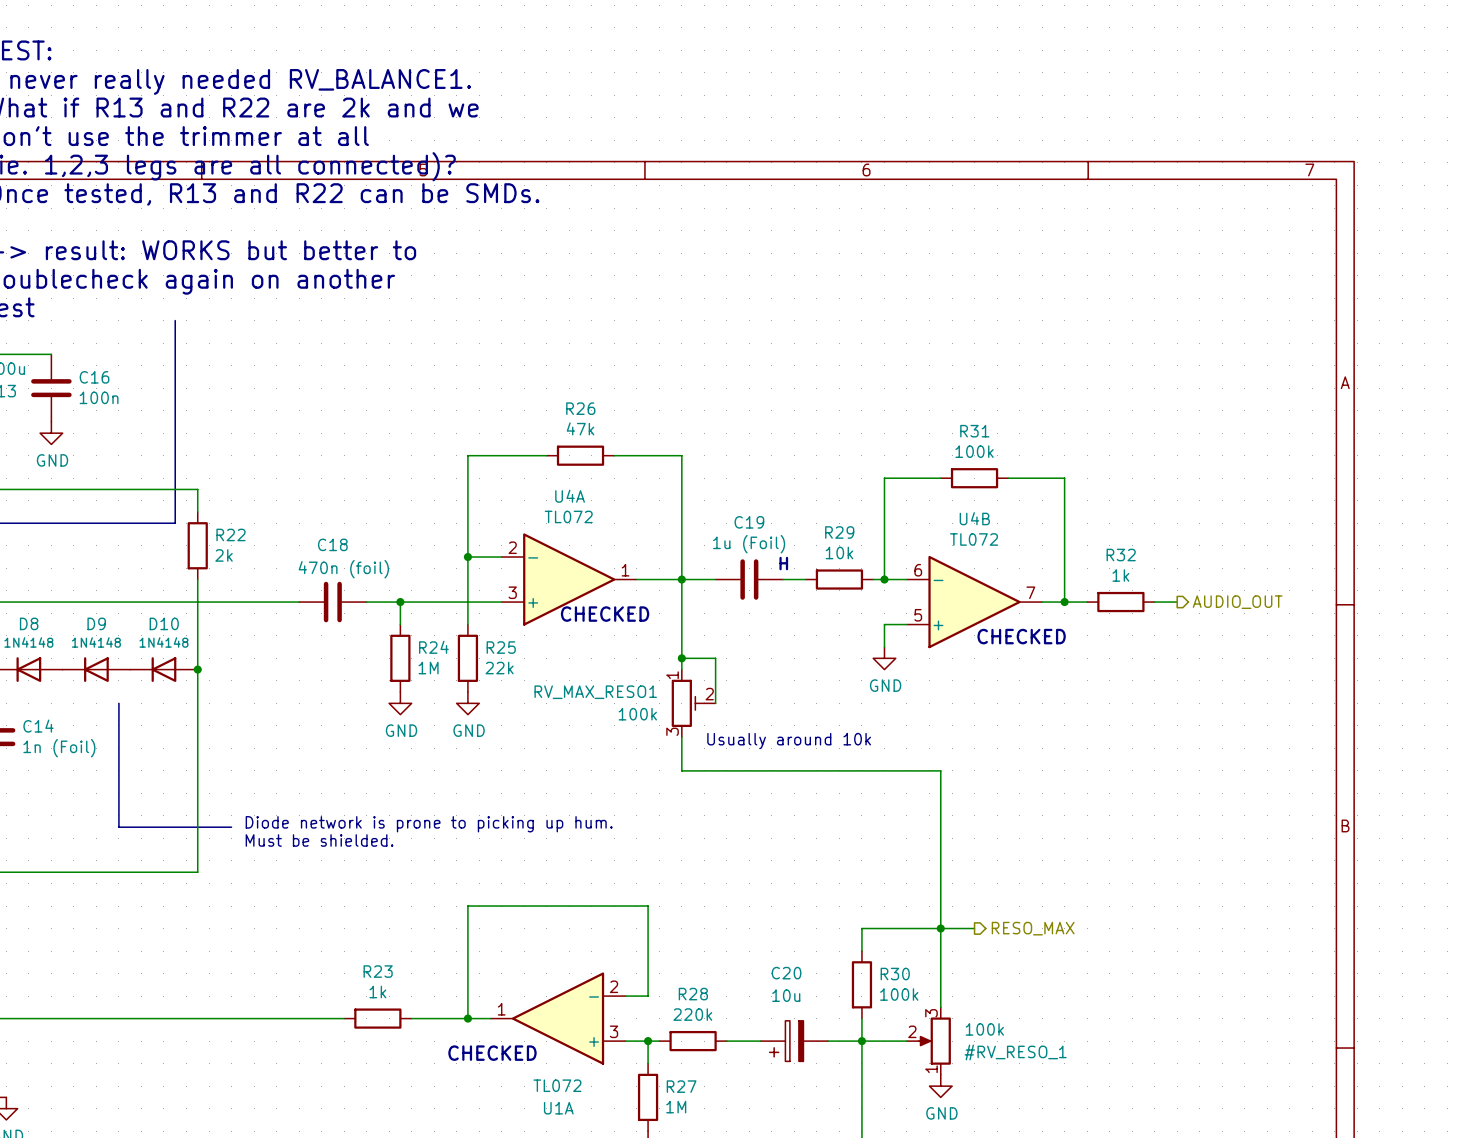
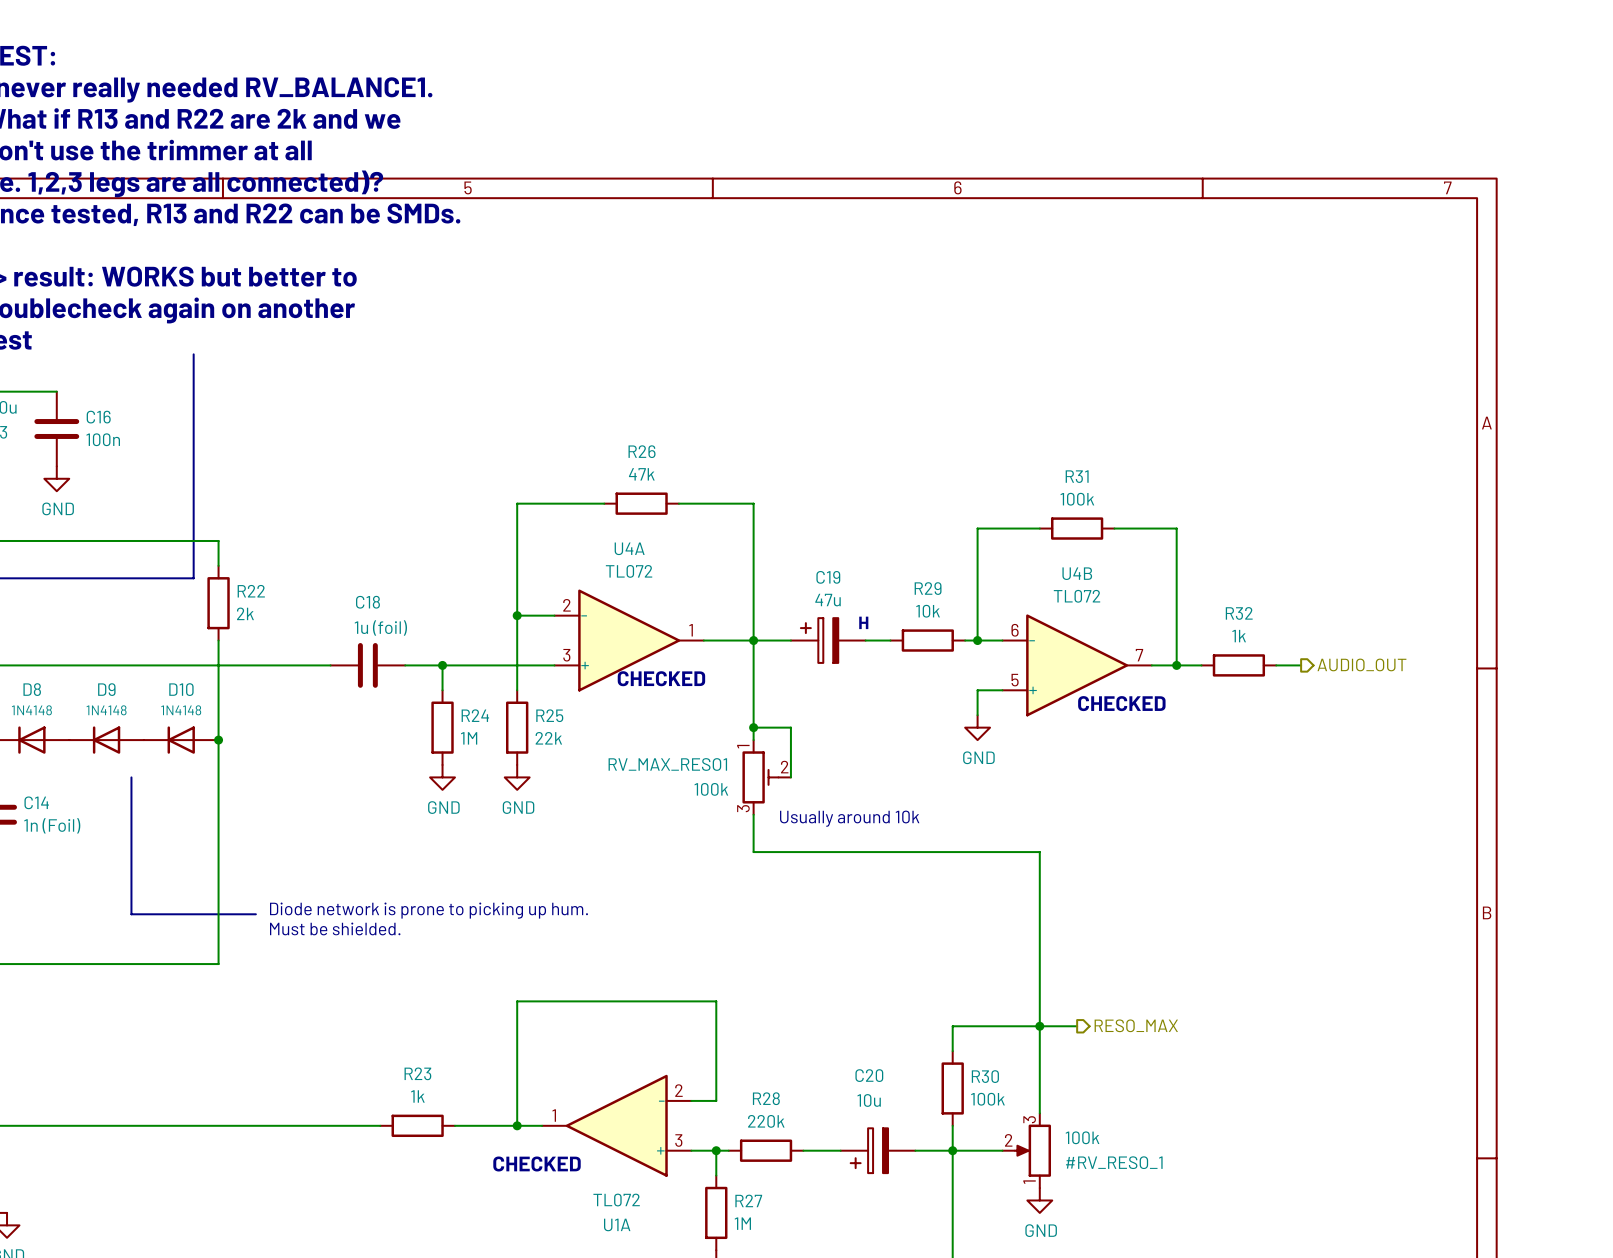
C19 value: 1u (Foil) (749, 544) -> 47u (828, 600)
C19 symbol: [715, 559, 784, 600] -> [790, 618, 866, 663]
C18 value: 470n (foil) (343, 569) -> 1u (foil) (380, 627)

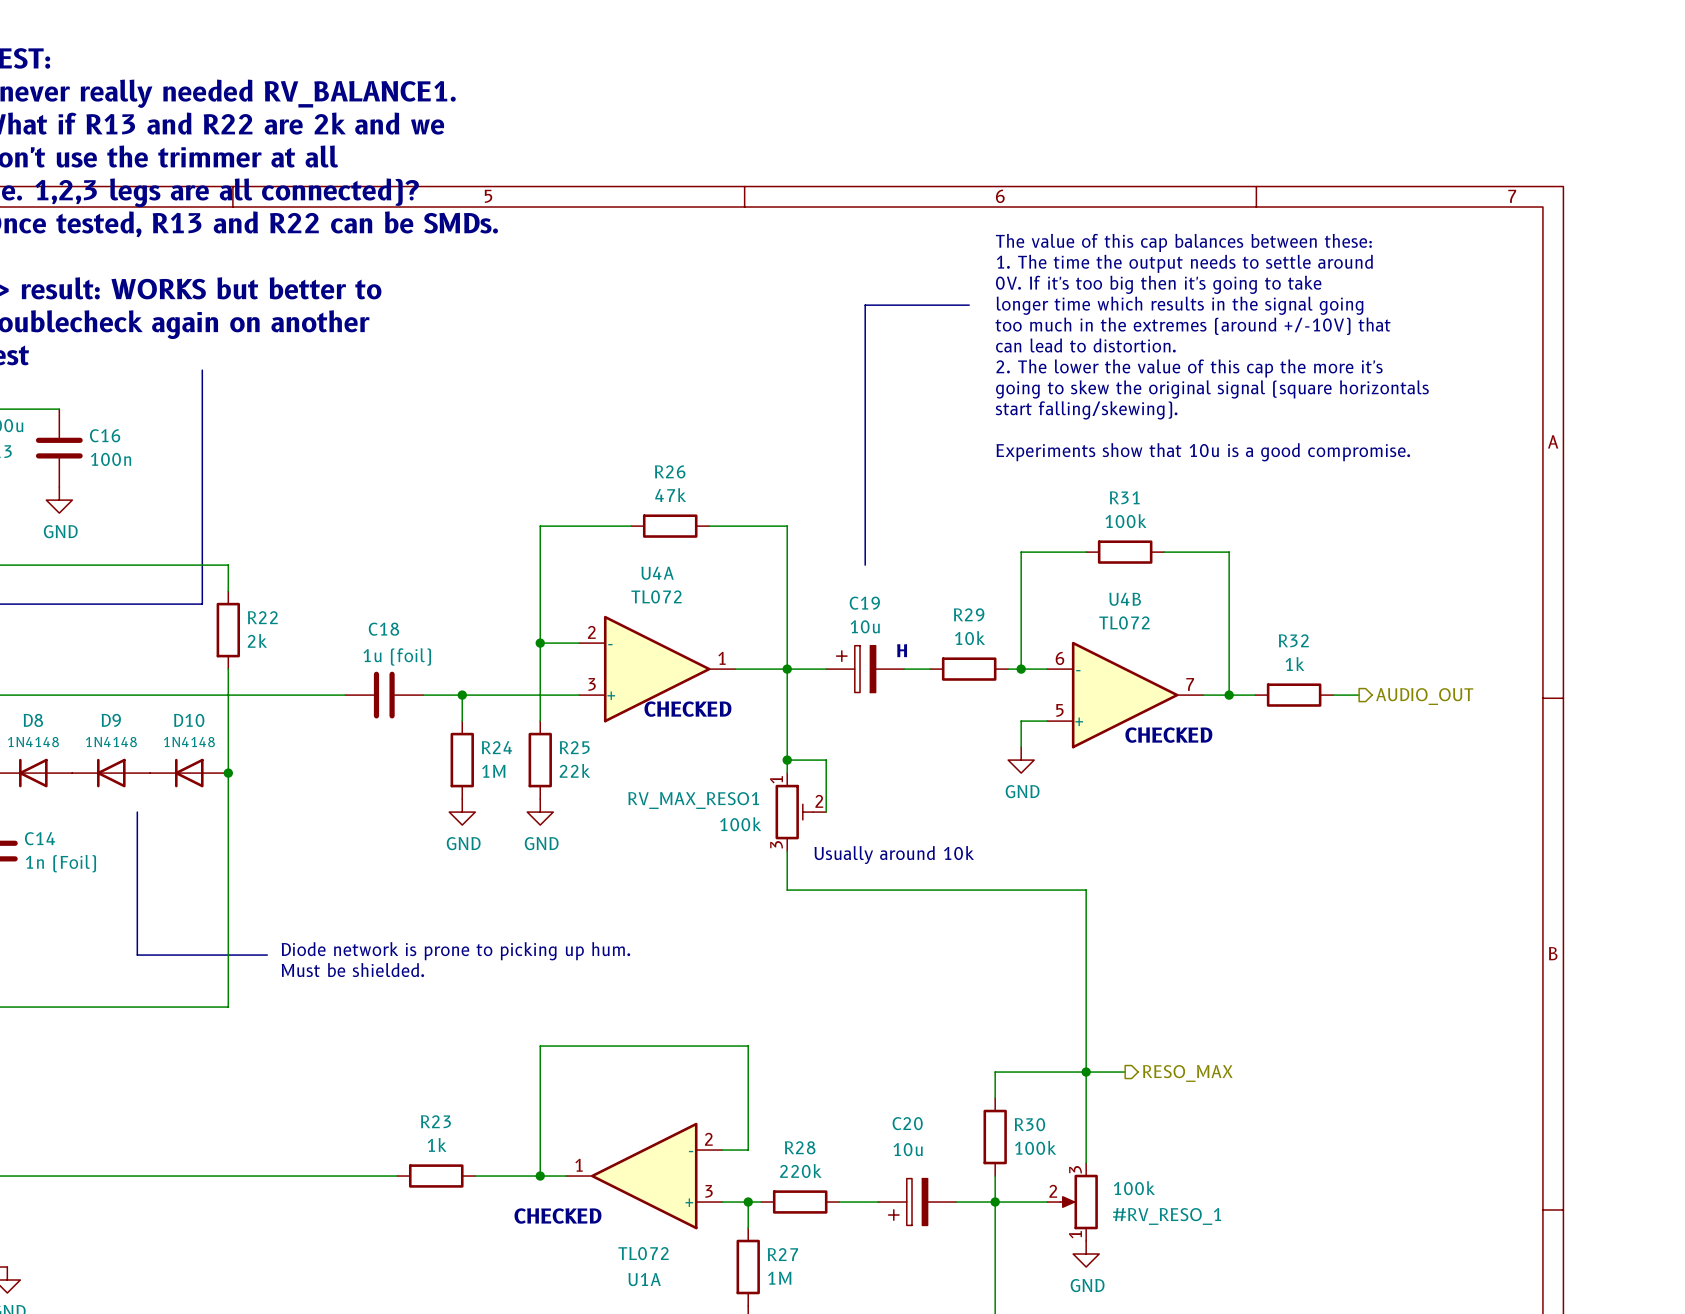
text: none -> The value of this cap balances between these: (1183, 242)
text: none -> 1. The time the output needs to settle around (1184, 263)
text: none -> 0V. If it's too big then it's going to take (1158, 284)
line: none -> (969, 305) (865, 305) (865, 565)
text: none -> longer time which results in the signal going (1180, 305)
text: none -> too much in the extremes (around +/-10V) that (1193, 326)
text: none -> can lead to distortion. (1085, 345)
text: none -> 2. The lower the value of this cap the more it's (1189, 368)
text: none -> going to skew the original signal (square horizontals (1212, 389)
text: none -> start falling/skewing). (1086, 410)
text: none -> Experiments show that 10u is a good compromise. (1203, 452)
C19 value: 47u (828, 600) -> 10u (865, 626)

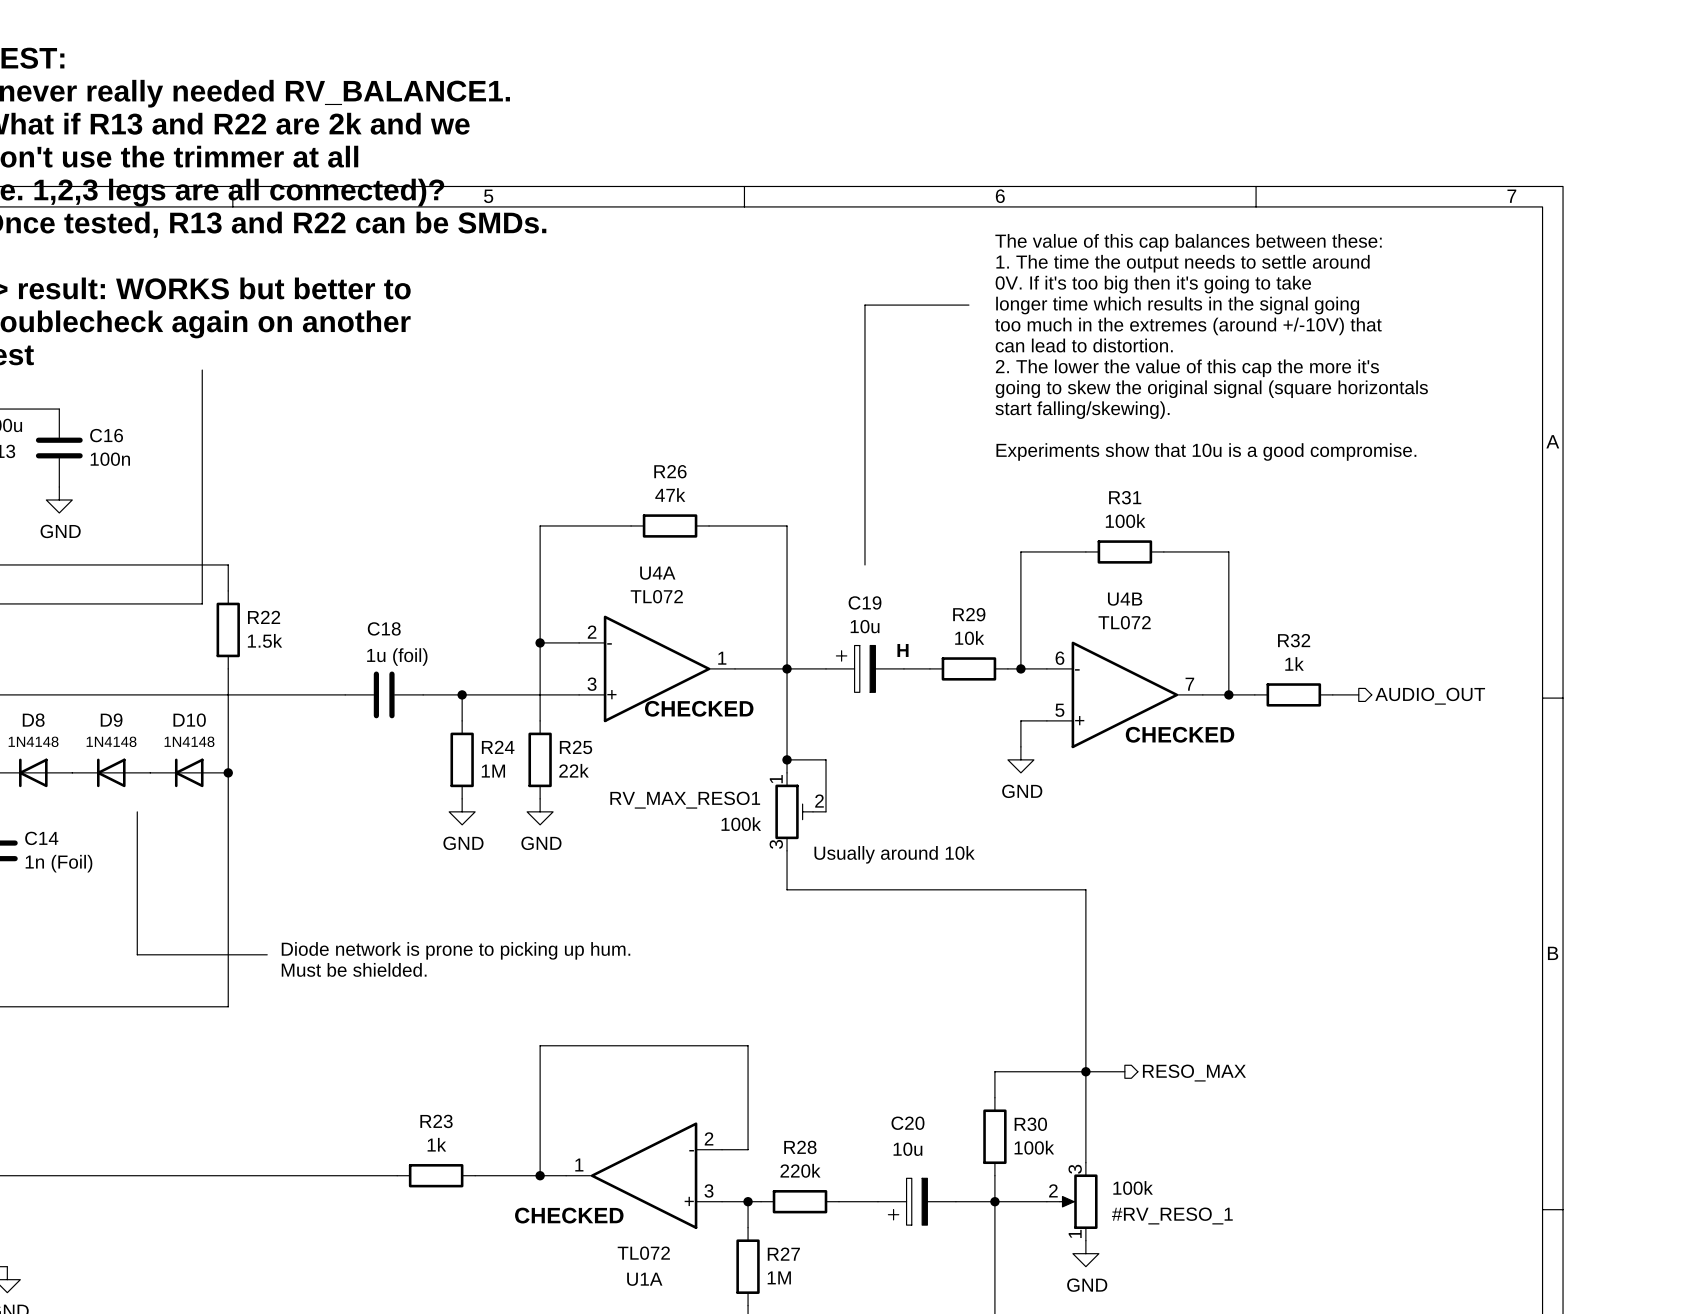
R22 value: 2k (257, 640) -> 1.5k (265, 640)

